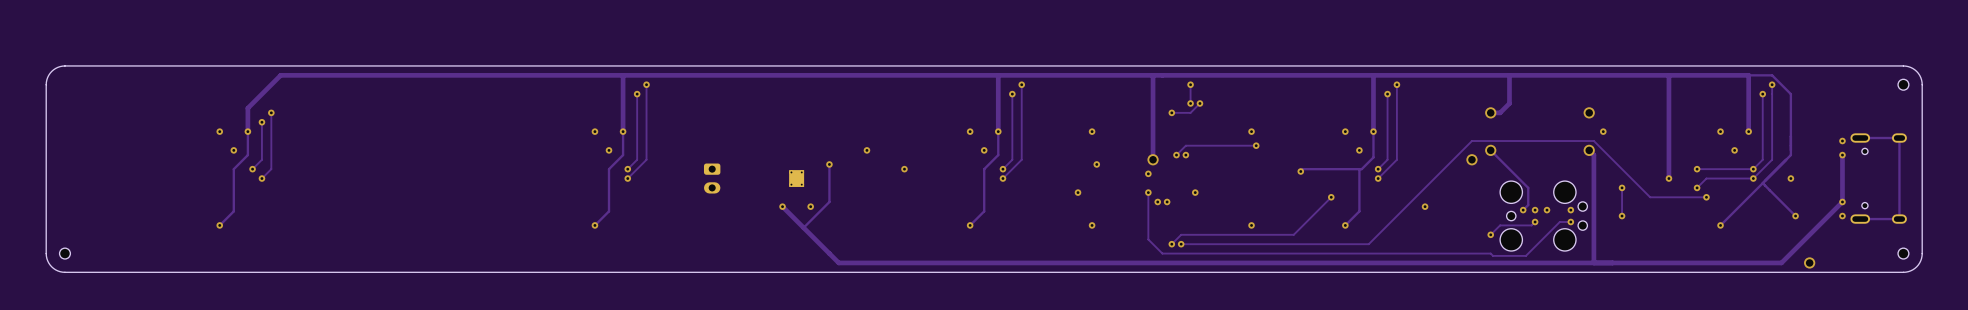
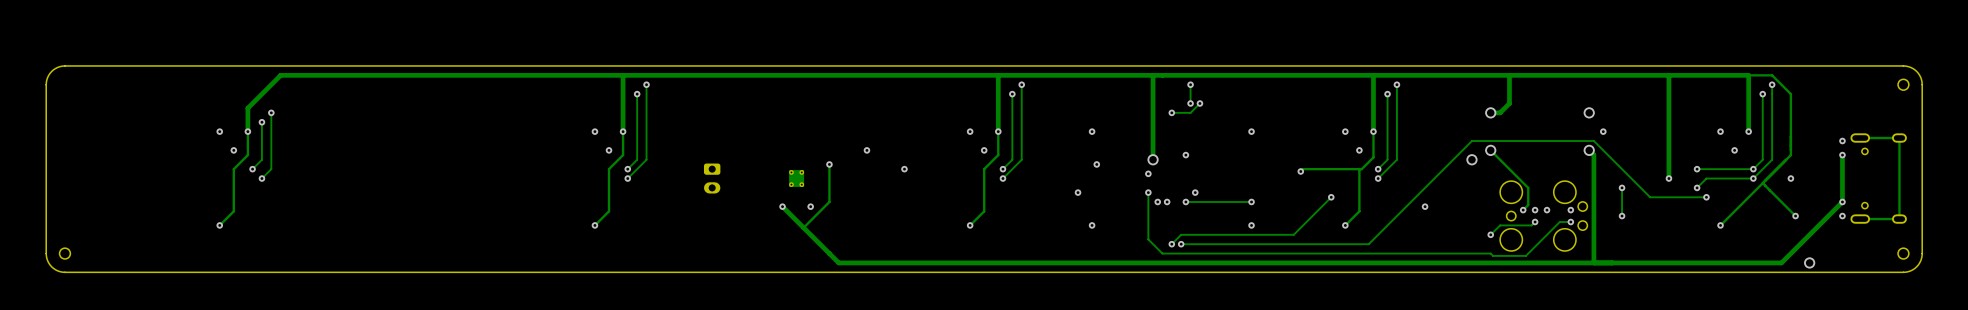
track: (1256, 145) (1185, 145) (1176, 155) -> none
via: (1256, 145) -> none
via: (1176, 155) -> none
via: none -> (1185, 201)
track: none -> (1251, 201) (1185, 201)
via: none -> (1251, 201)

